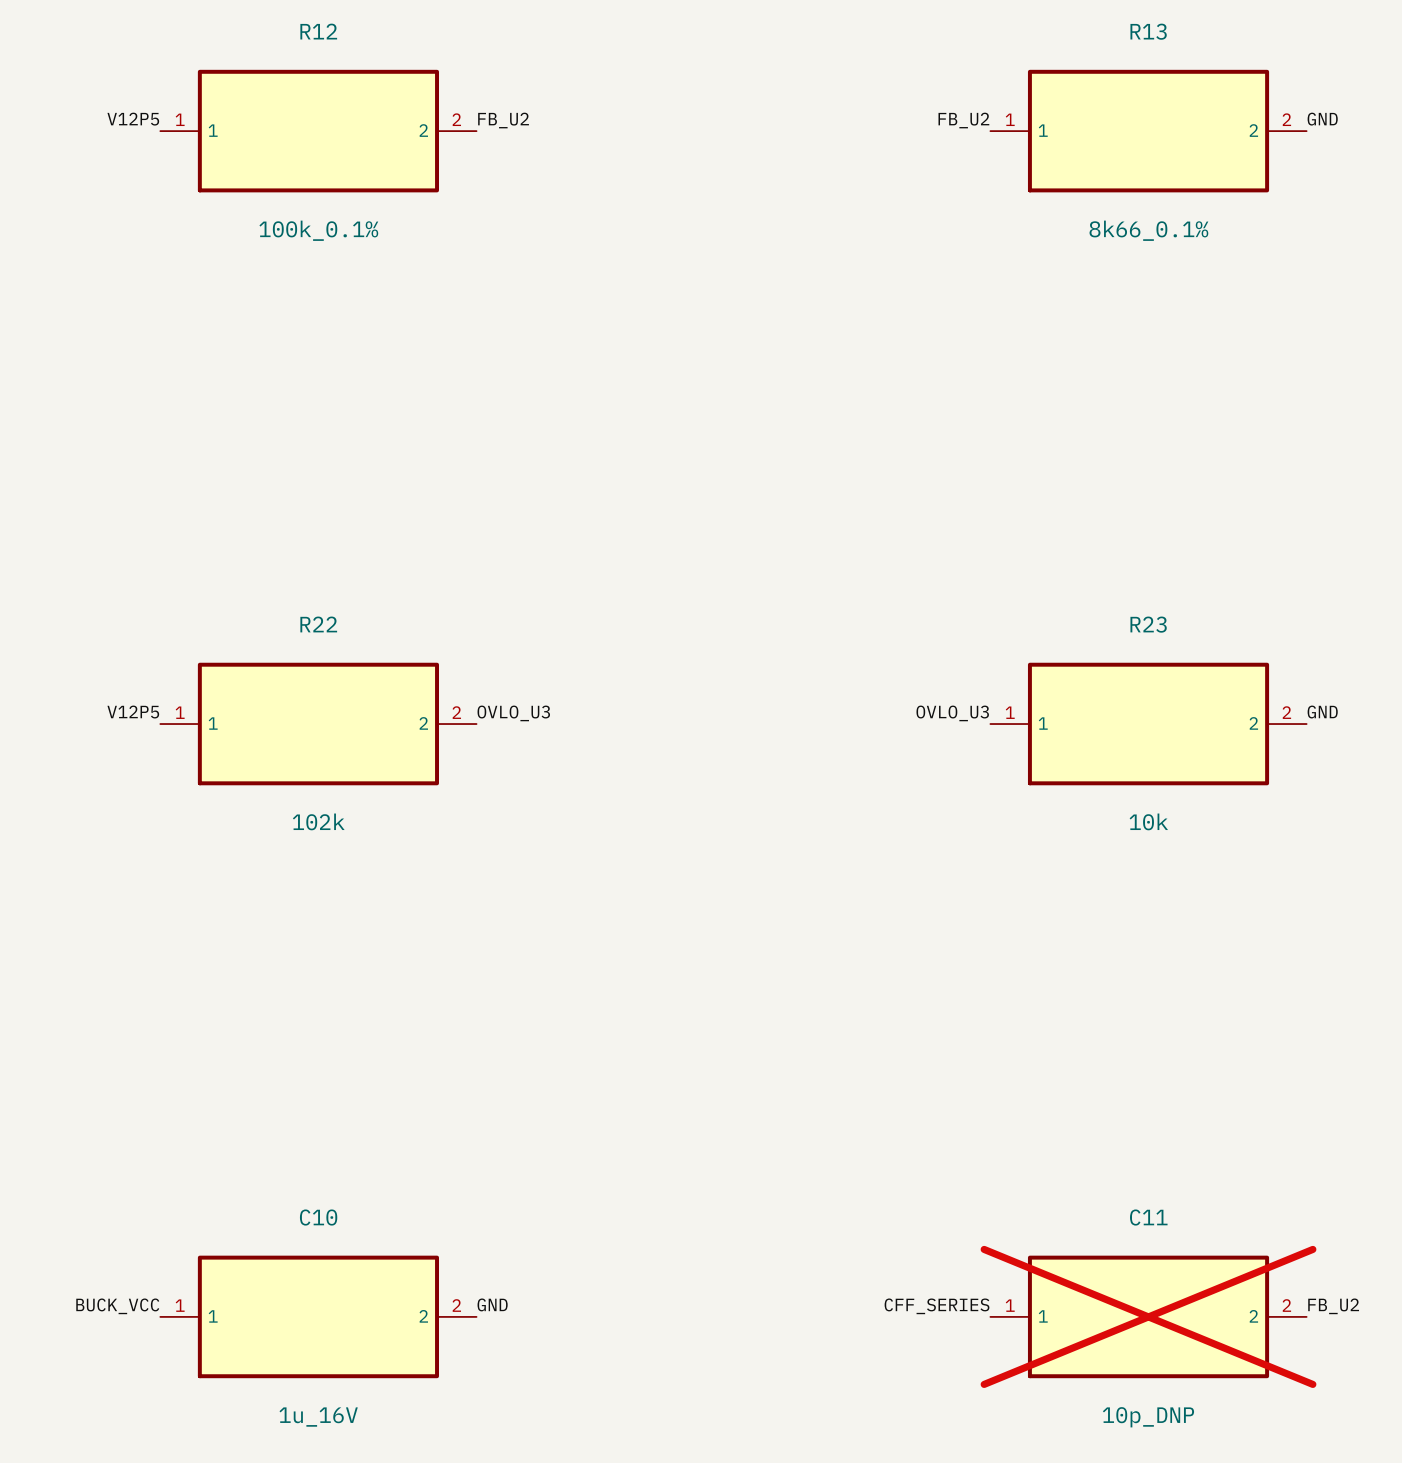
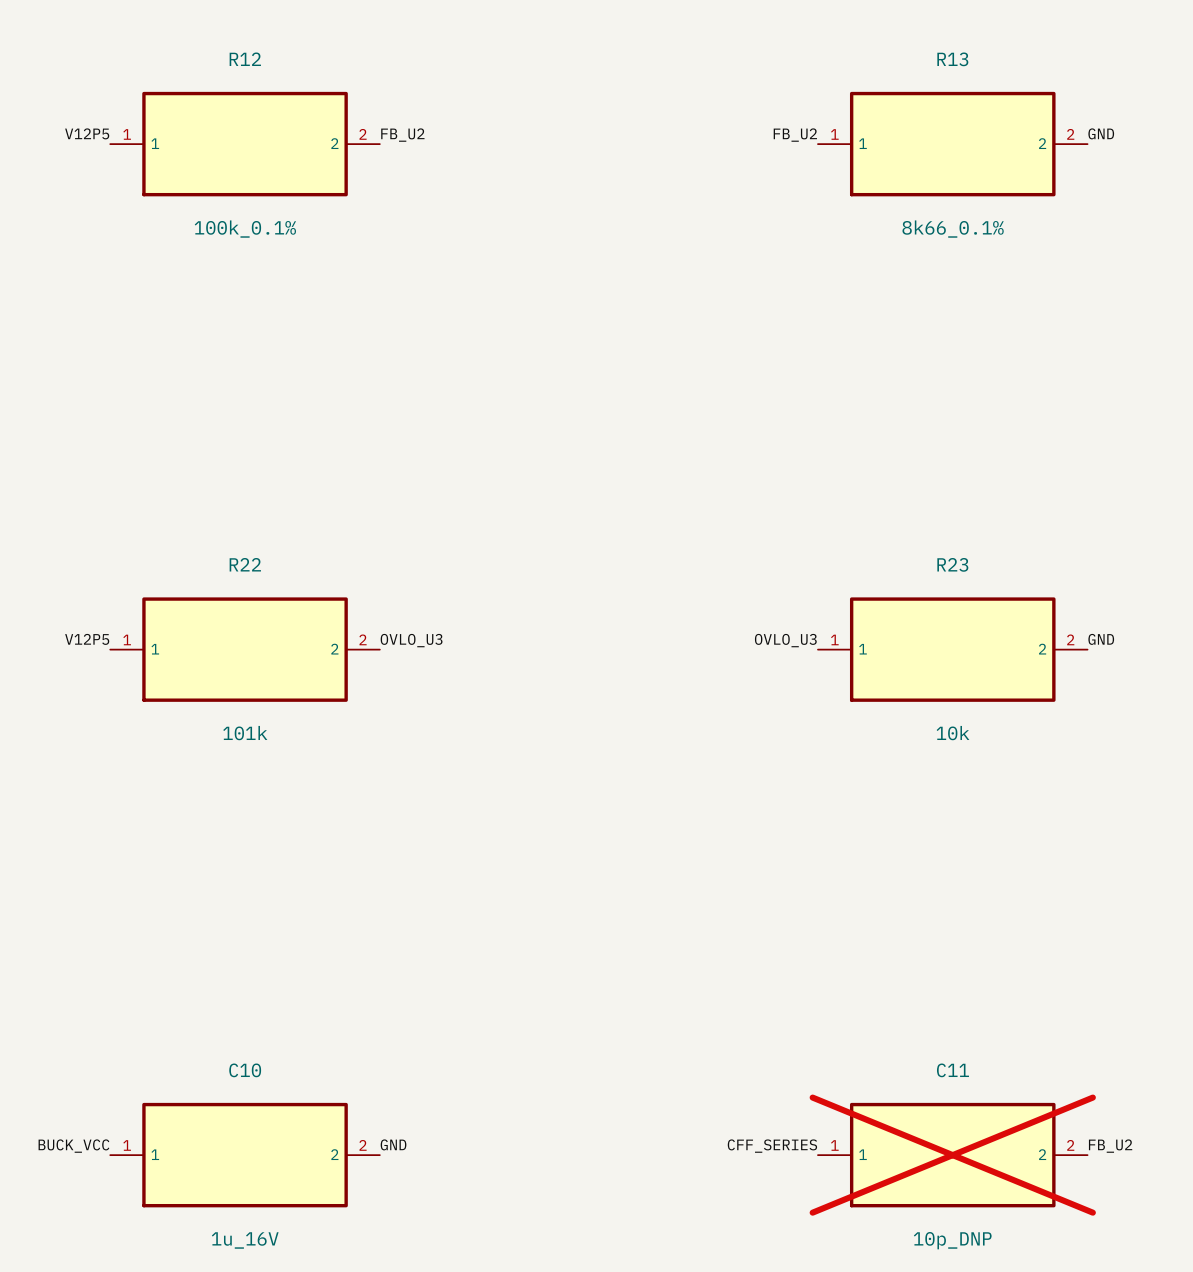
R22 value: 102k (318, 821) -> 101k (245, 733)

